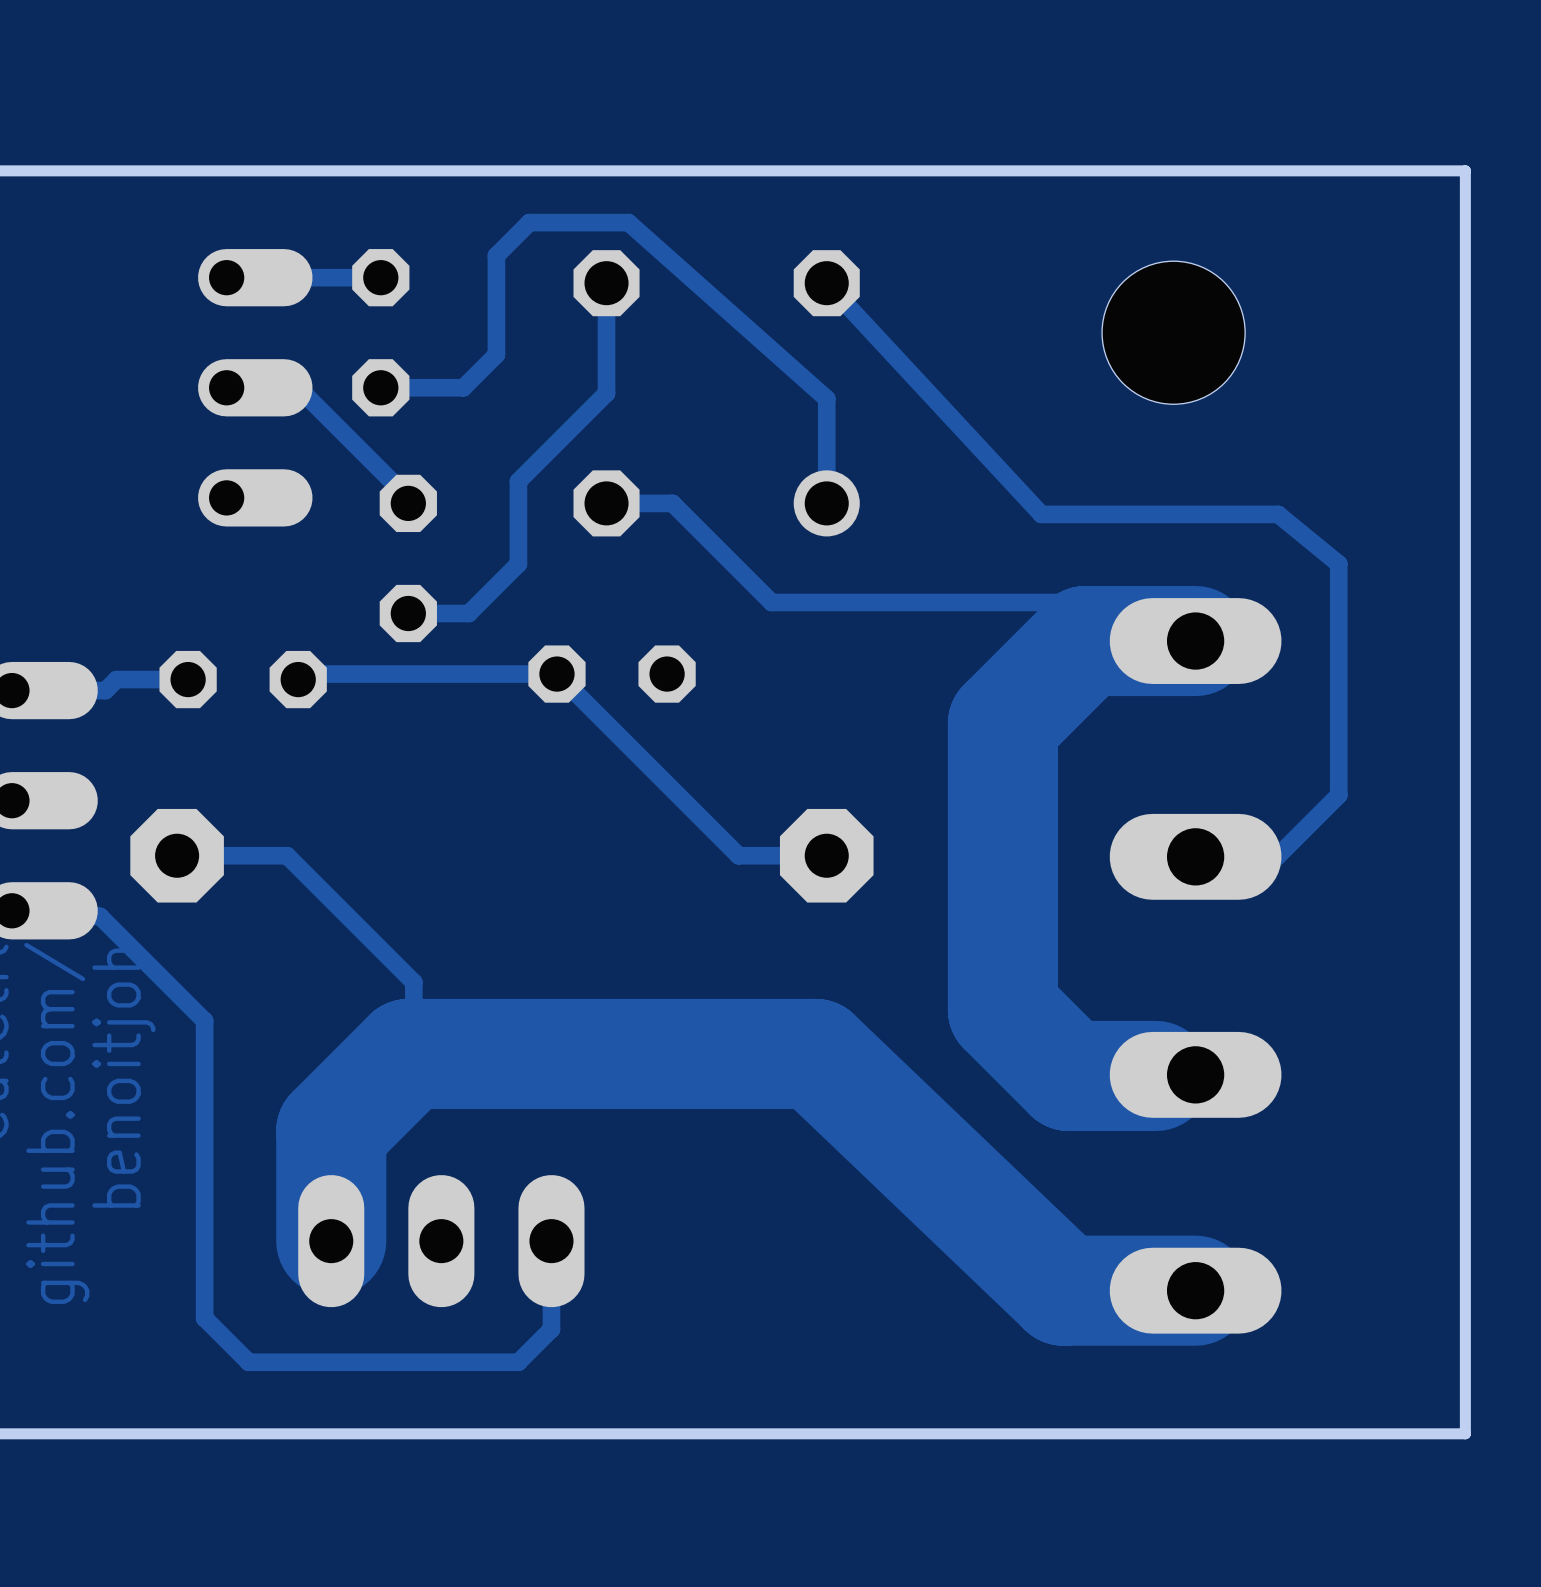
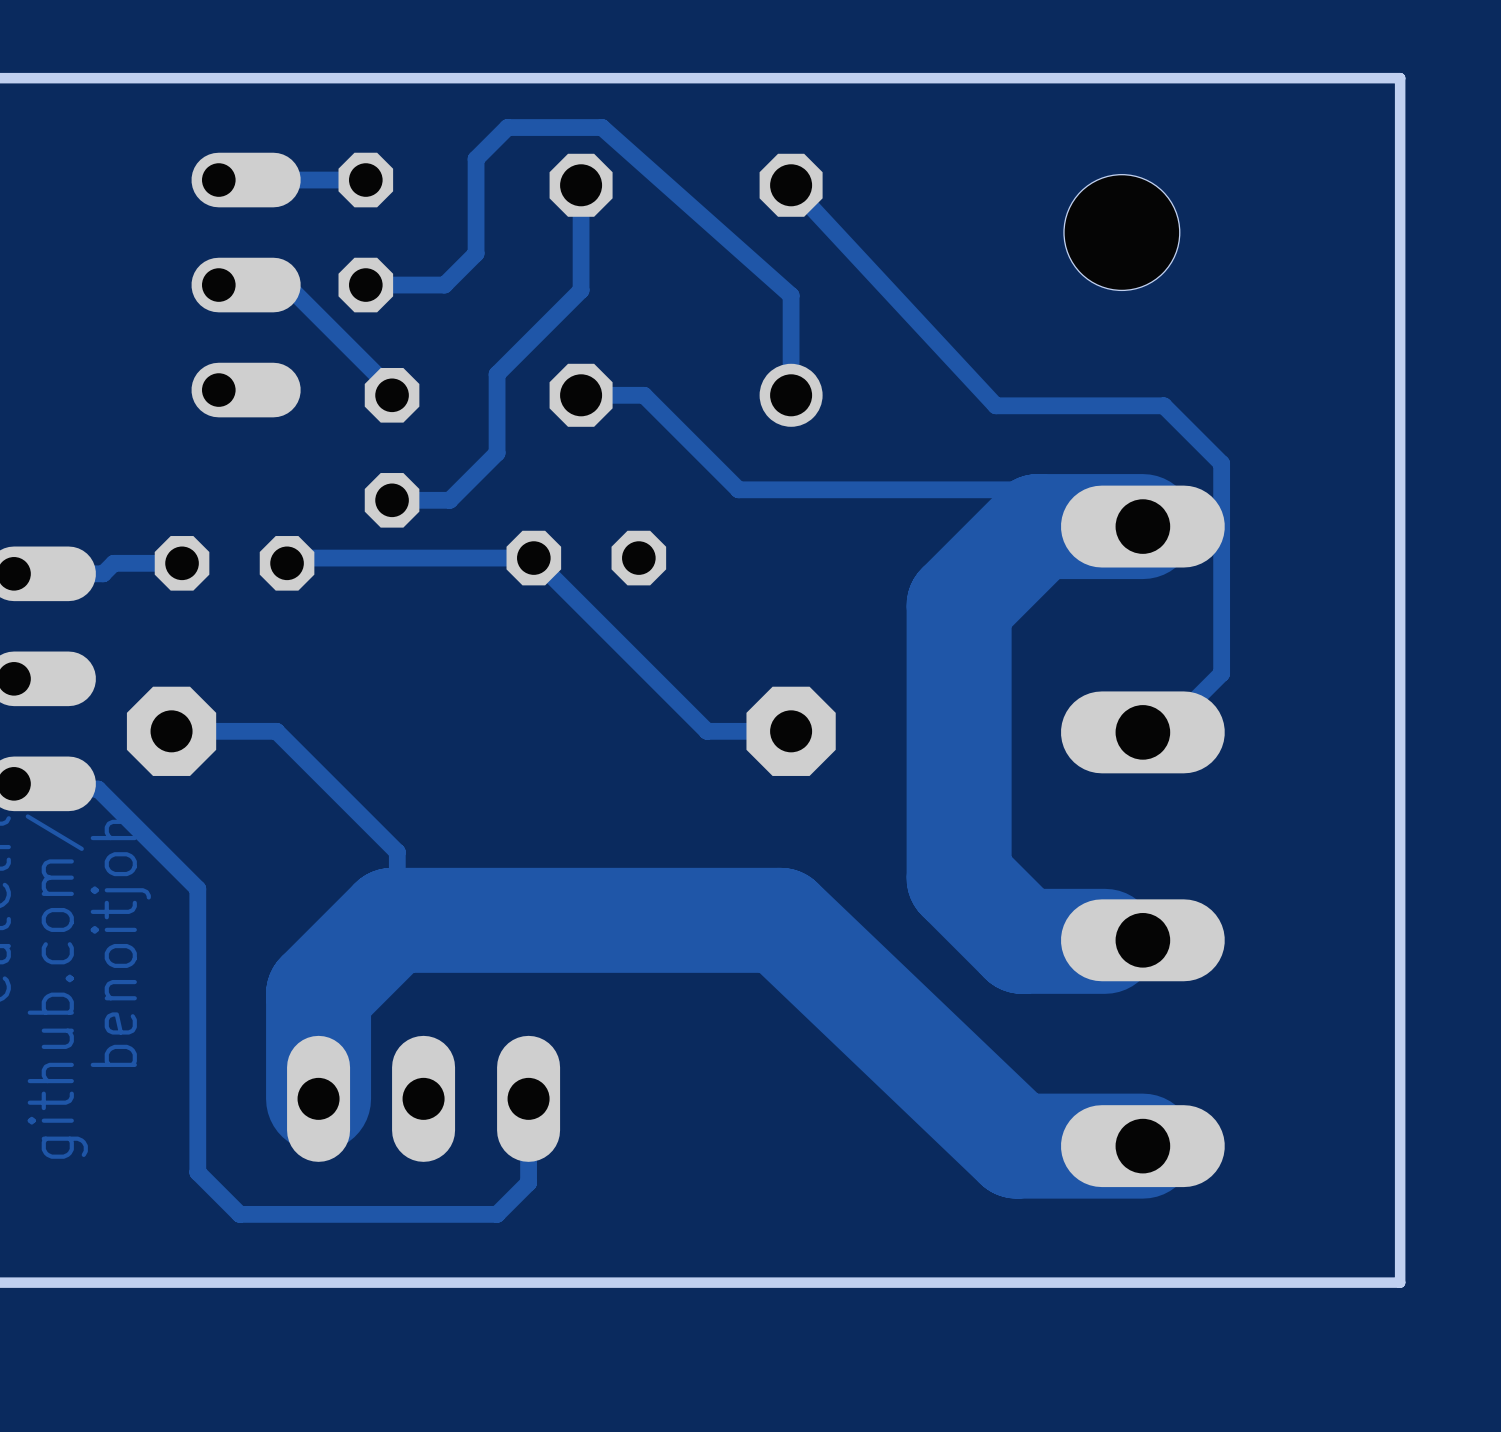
part footprint: [1102, 261, 1246, 405] -> [1064, 174, 1180, 291]
track: (1217, 514) (1278, 514) (1338, 563) (1338, 795) (1277, 856) (1216, 856) -> (1163, 405) (1221, 463) (1221, 673) (1162, 732)

